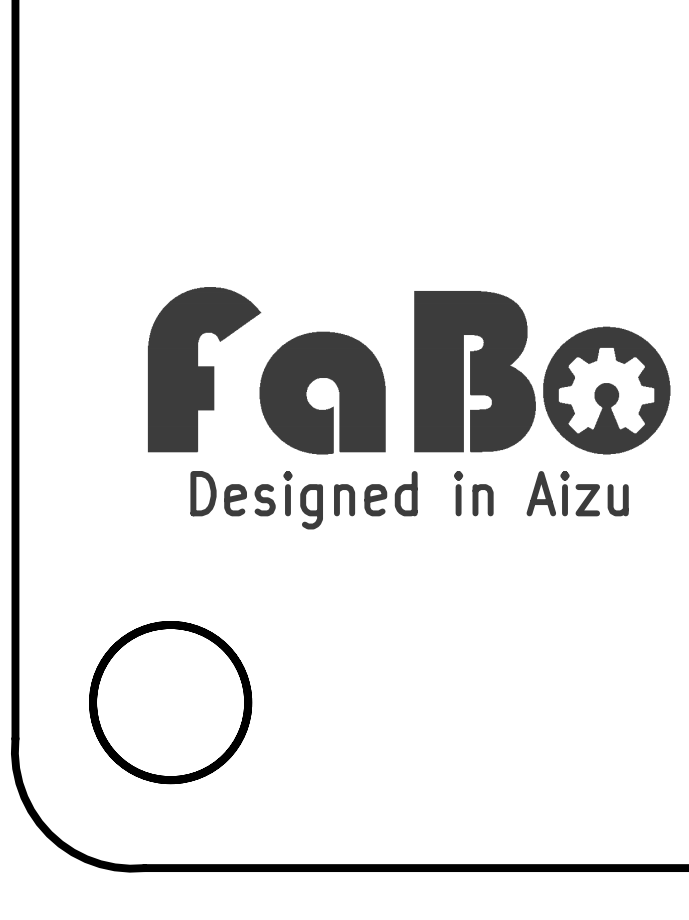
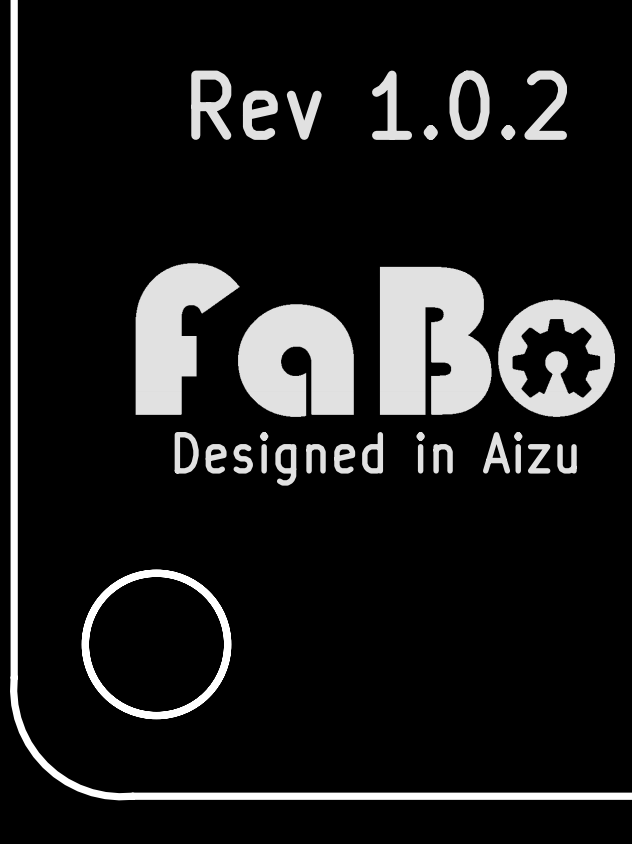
text: none -> Rev 1.0.2 (379, 105)

